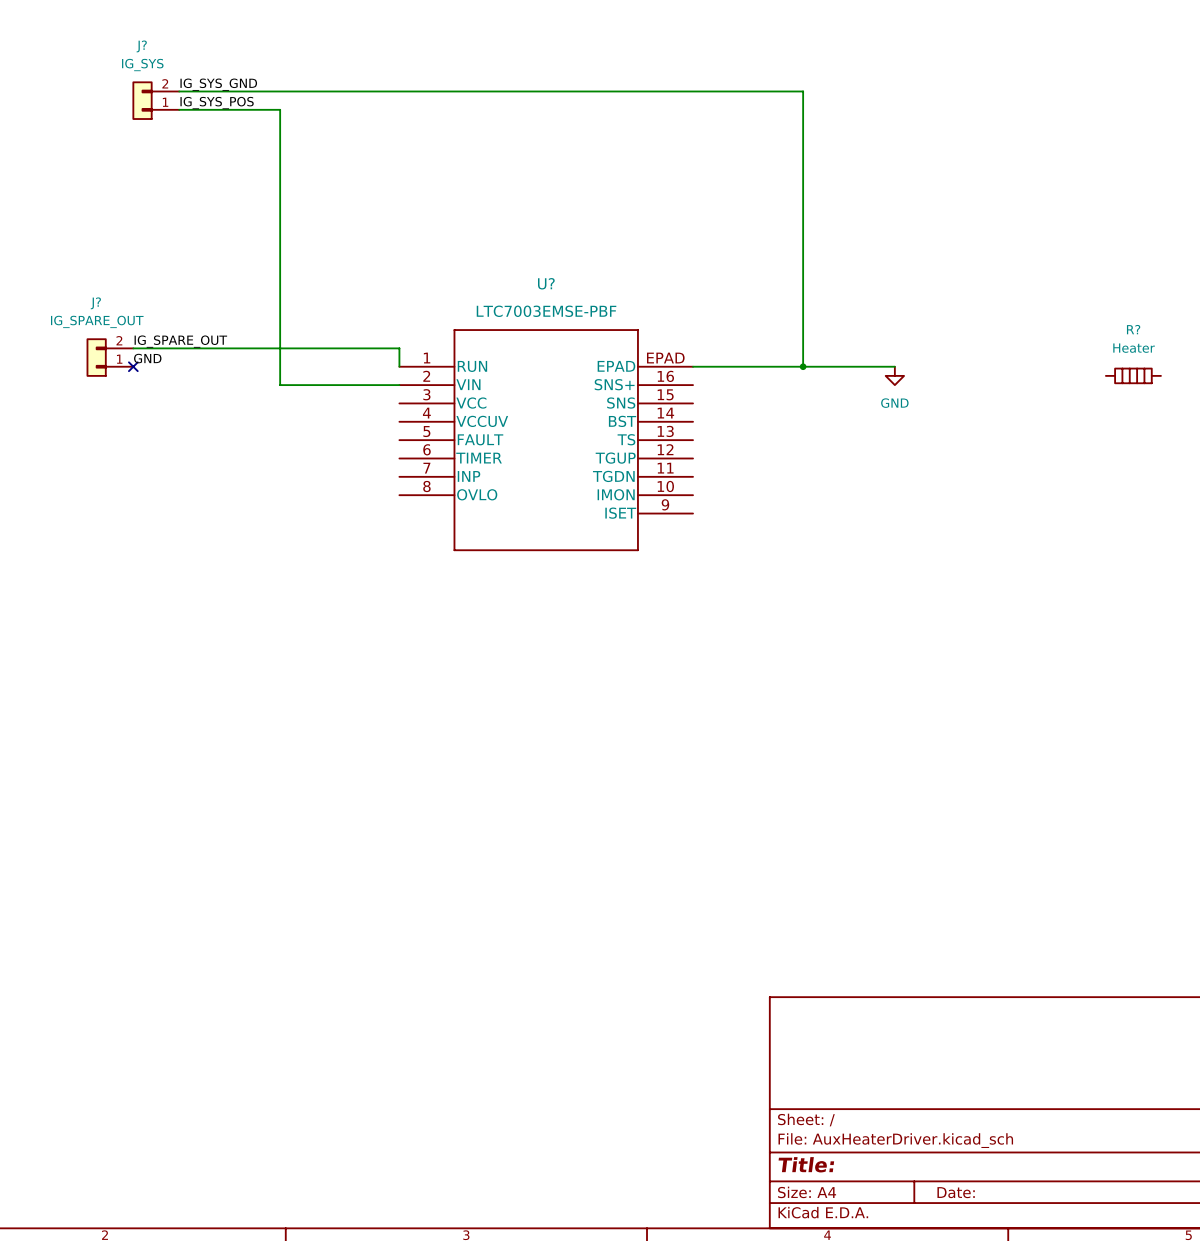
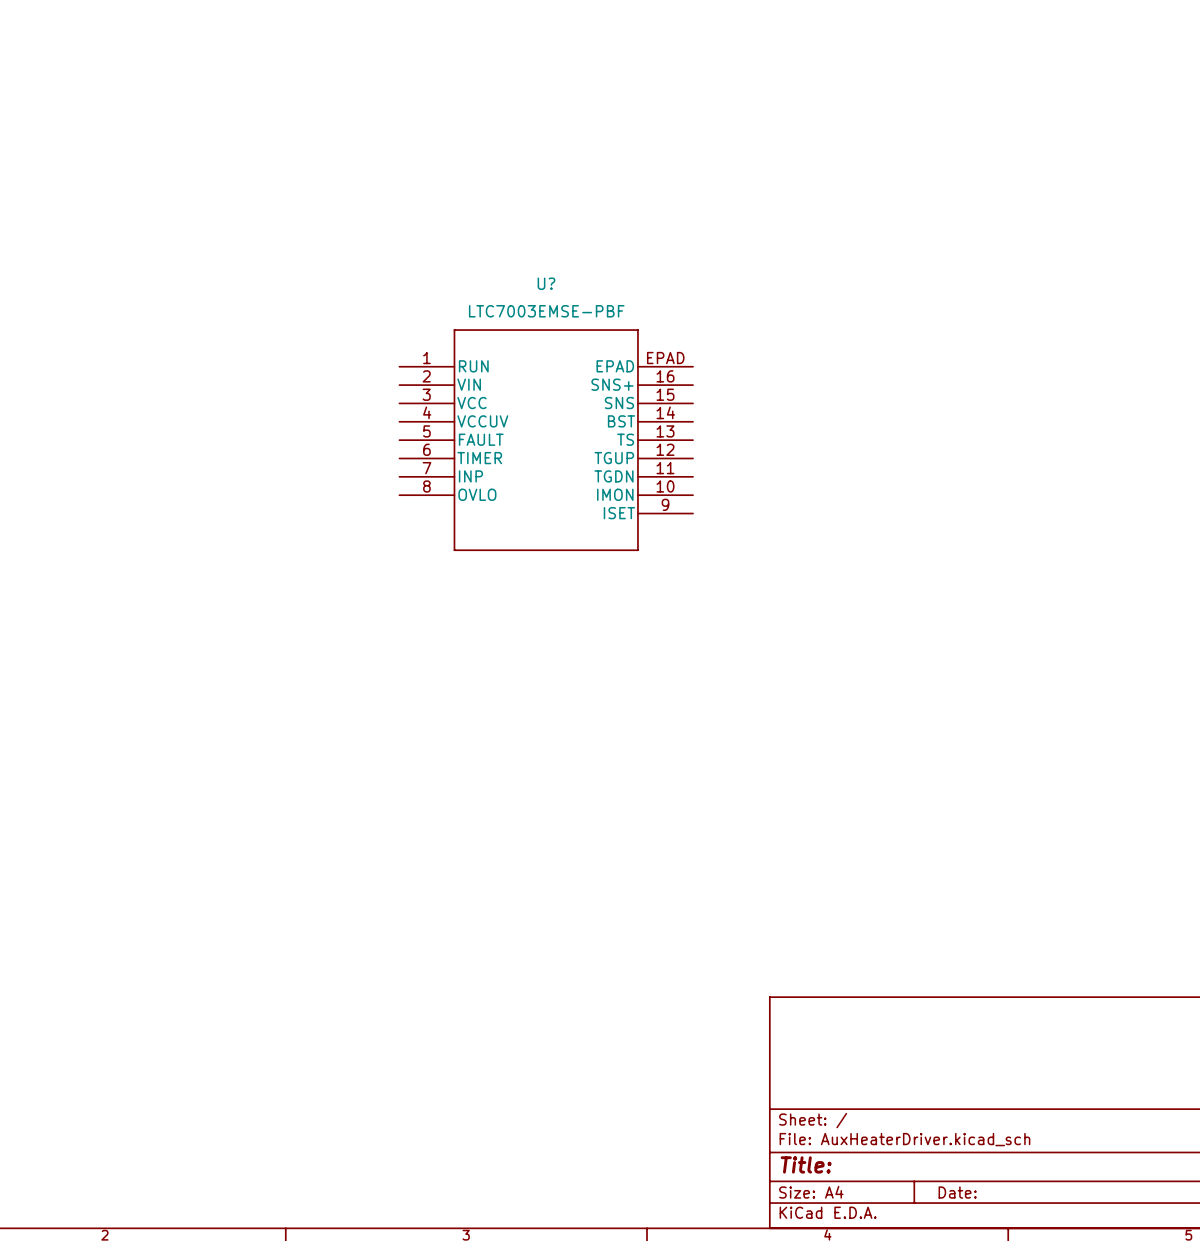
label: IG_SYS_GND (218, 84) -> none
wire: (179, 91) (803, 91) (803, 366) -> none
J?: IG_SYS (155, 100) -> none
label: IG_SYS_POS (217, 103) -> none
wire: (179, 109) (280, 109) (280, 385) (399, 385) -> none
label: IG_SPARE_OUT (180, 341) -> none
wire: (133, 348) (399, 348) (399, 366) -> none
J?: IG_SPARE_OUT (109, 357) -> none
label: GND (147, 358) -> none
no-connect mark: (133, 366) -> none
wire: (693, 366) (894, 366) -> none
junction: (803, 366) -> none
power symbol: GND (894, 375) -> none
R?: Heater (1133, 375) -> none

